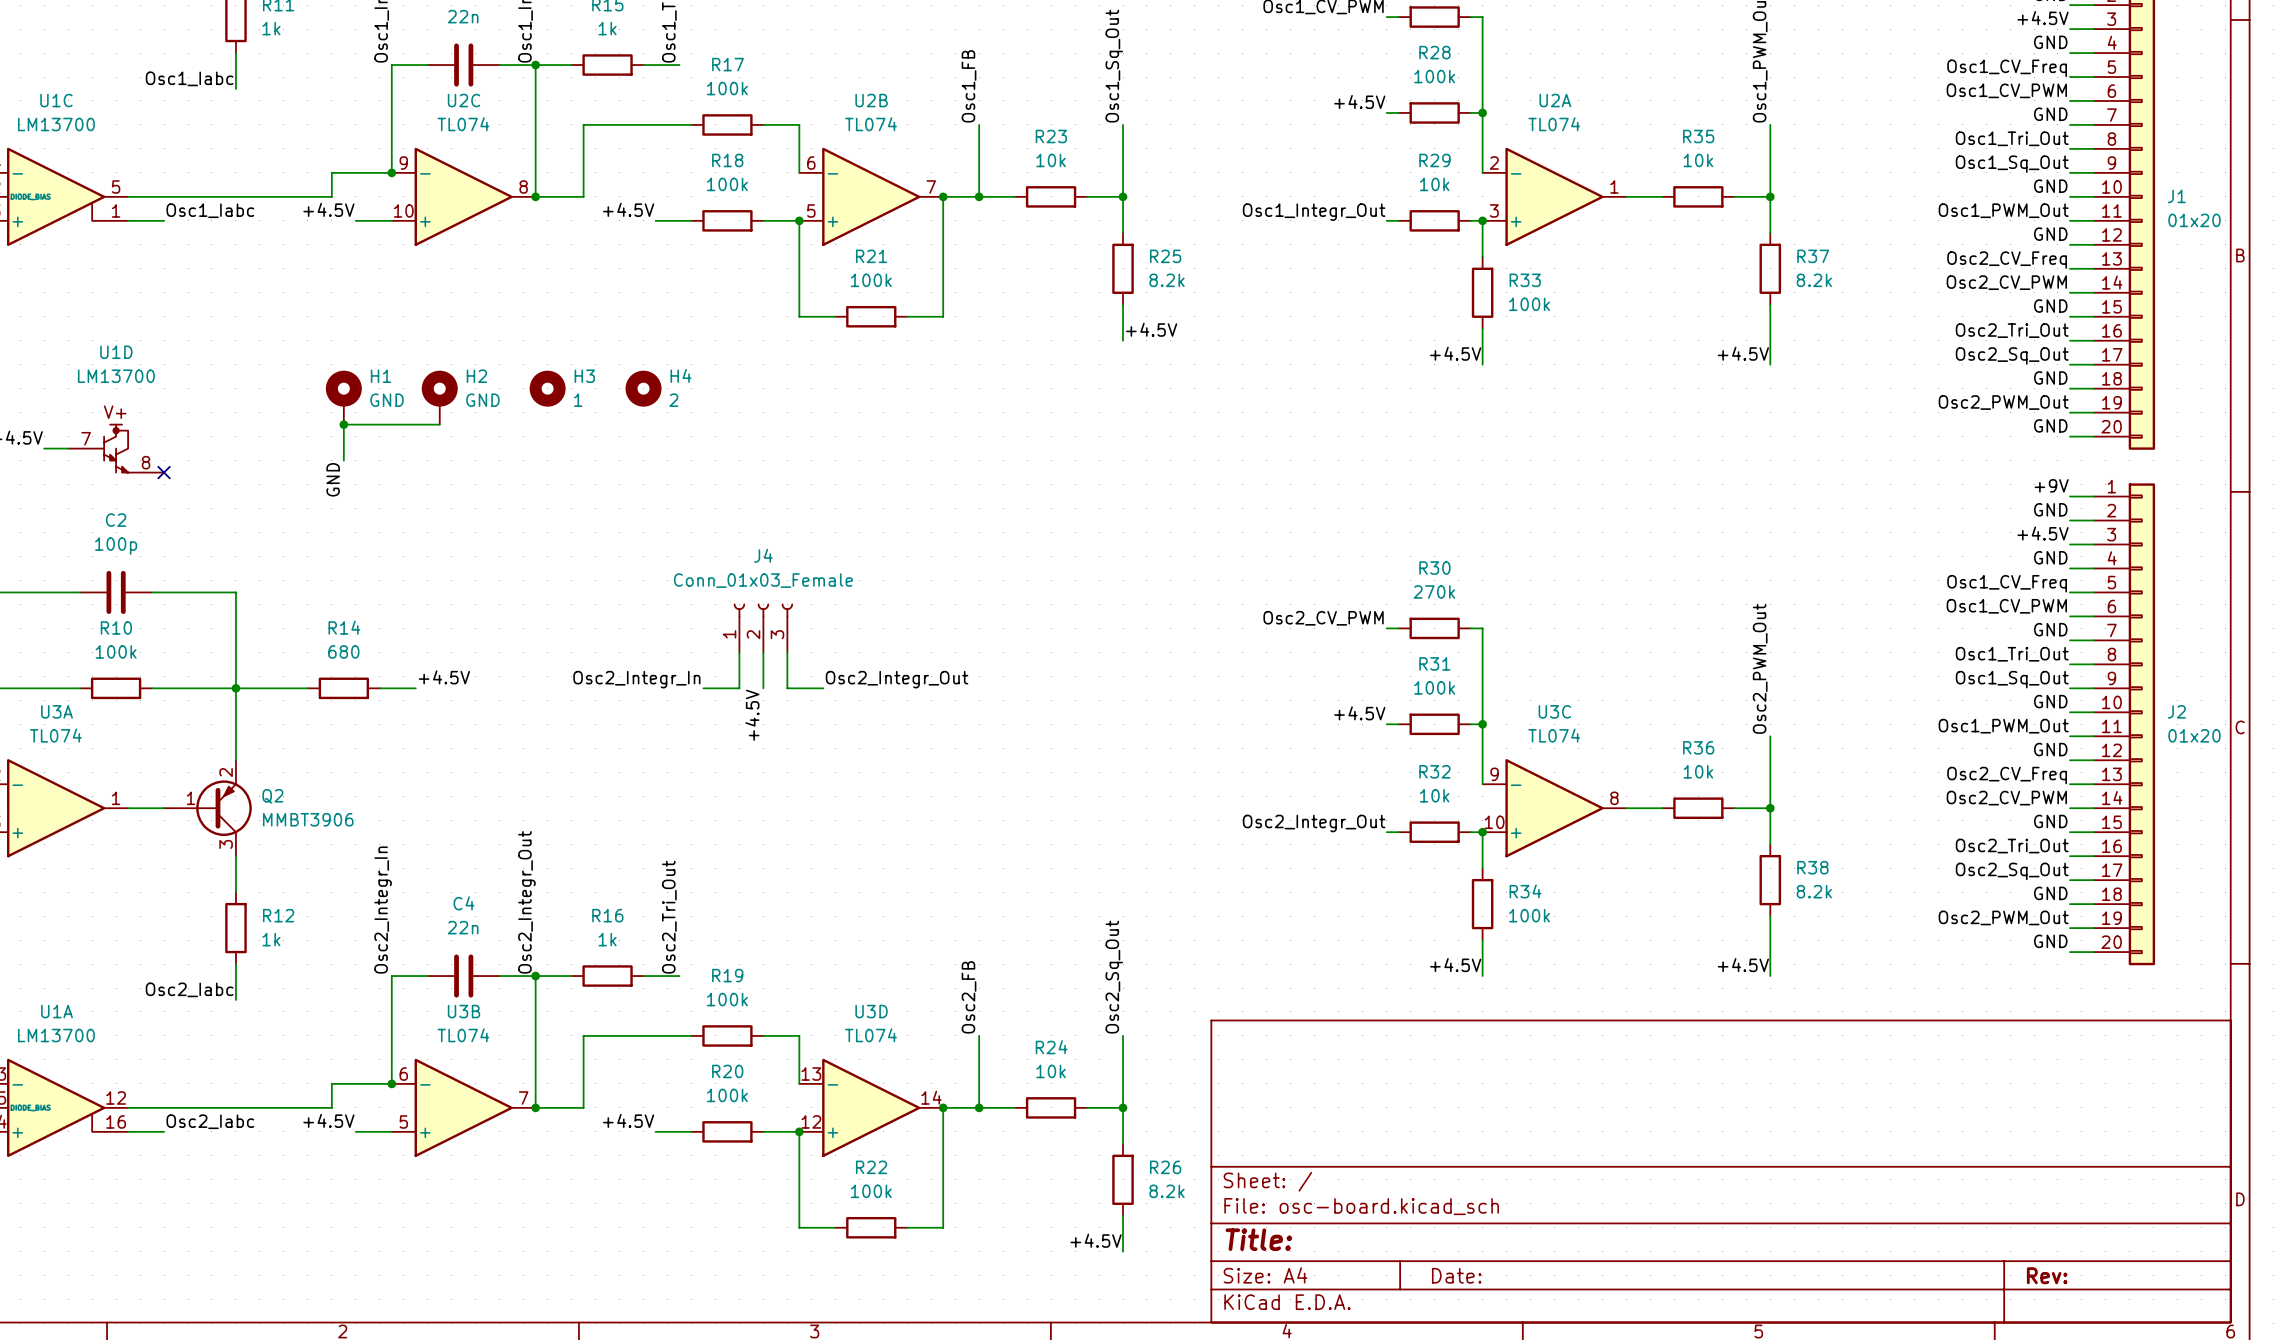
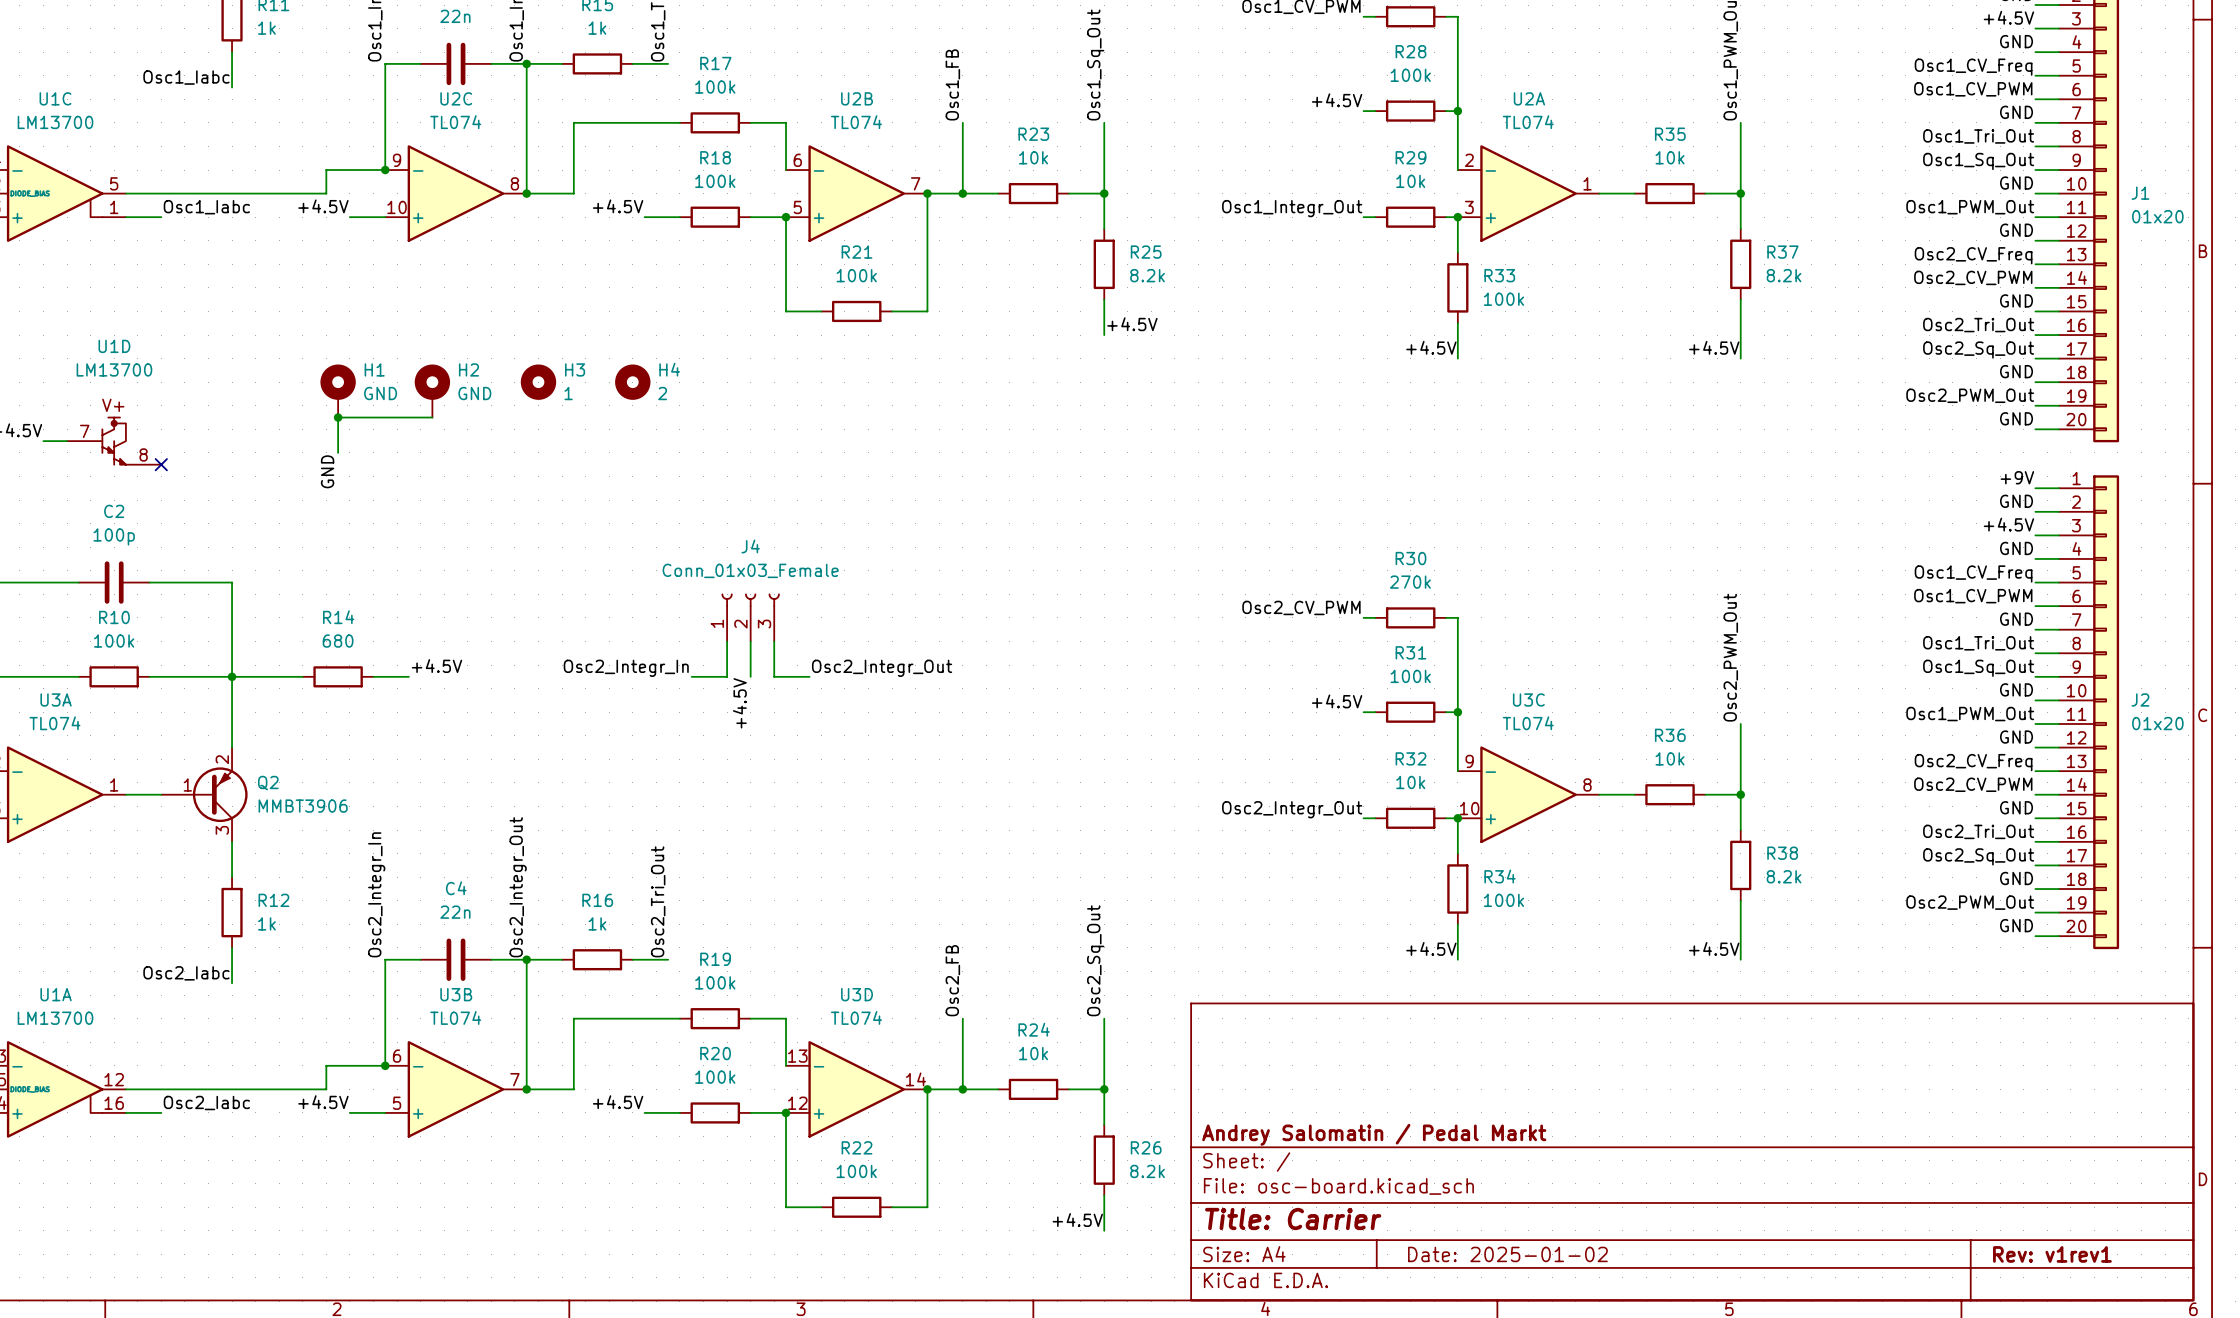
title block: none -> Andrey Salomatin / Pedal Markt (1374, 1134)
title block: Title: (1258, 1239) -> Title: Carrier (1293, 1219)
title block: Date: (1456, 1275) -> Date: 2025-01-02 (1507, 1254)
title block: Rev: (2047, 1275) -> Rev: v1rev1 (2052, 1254)

